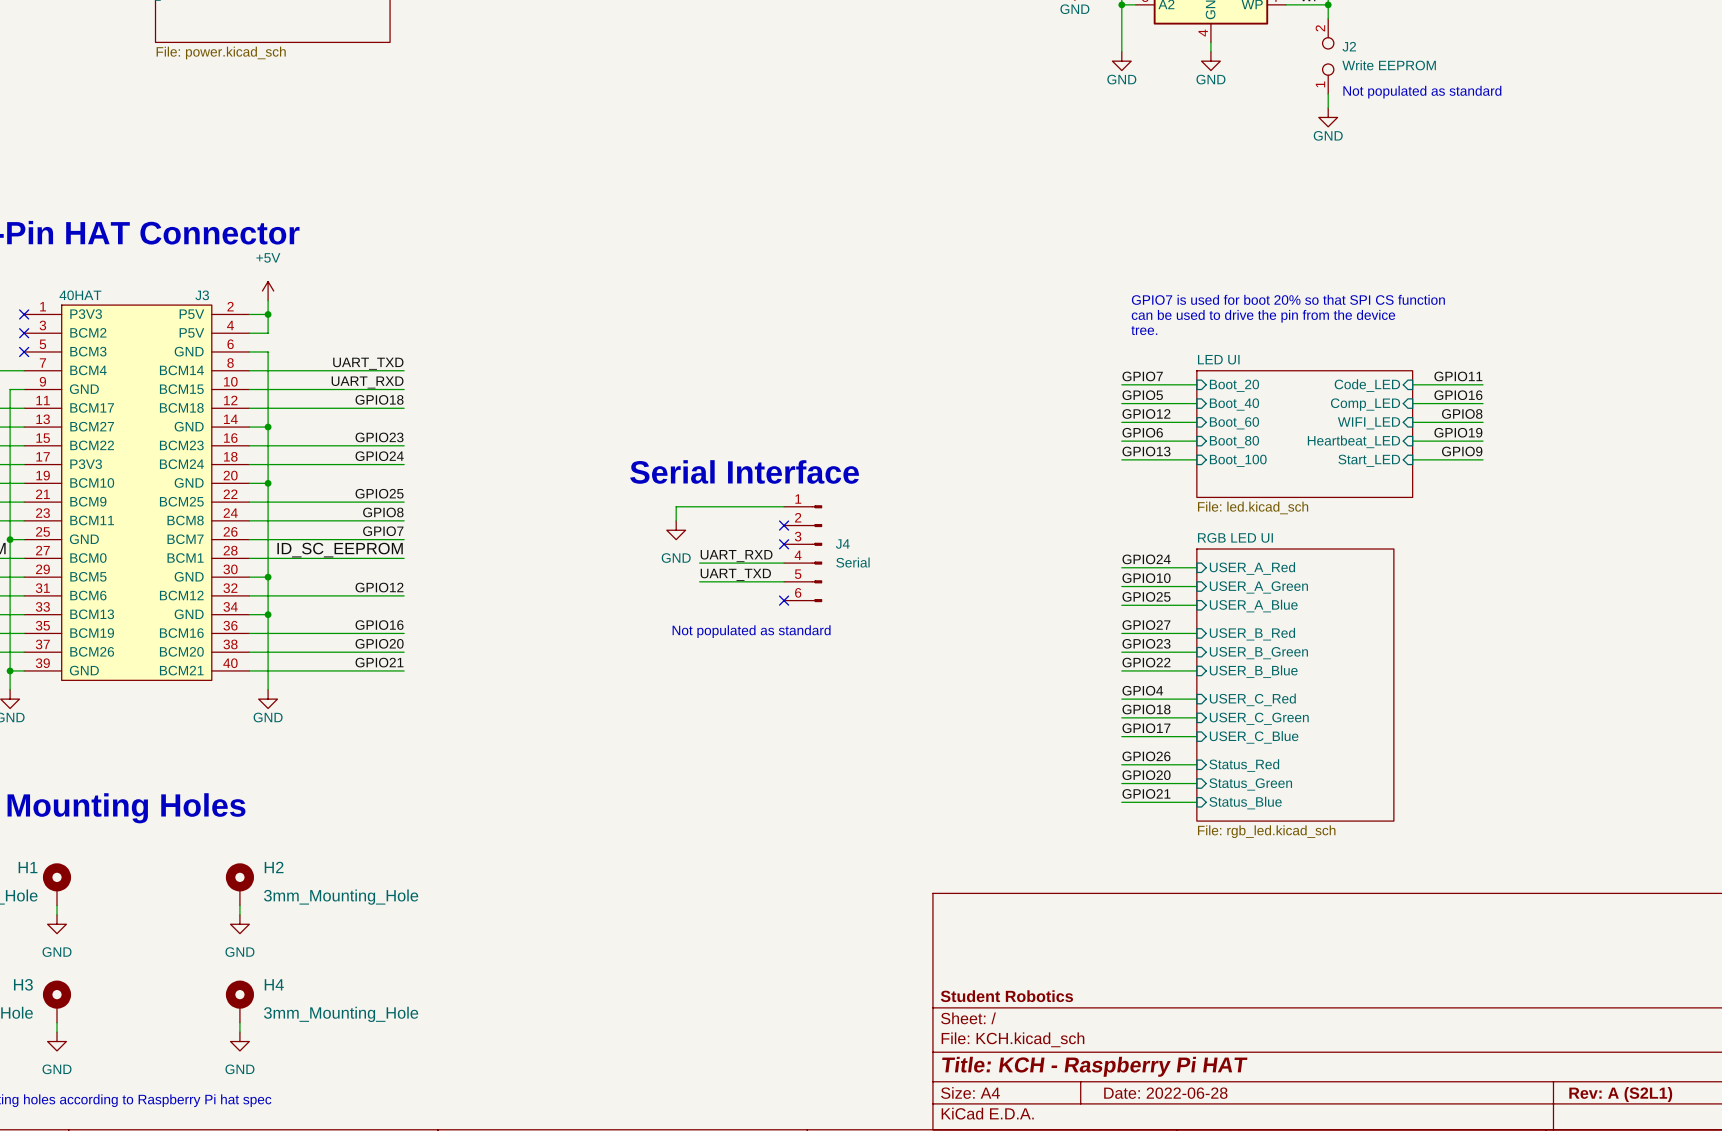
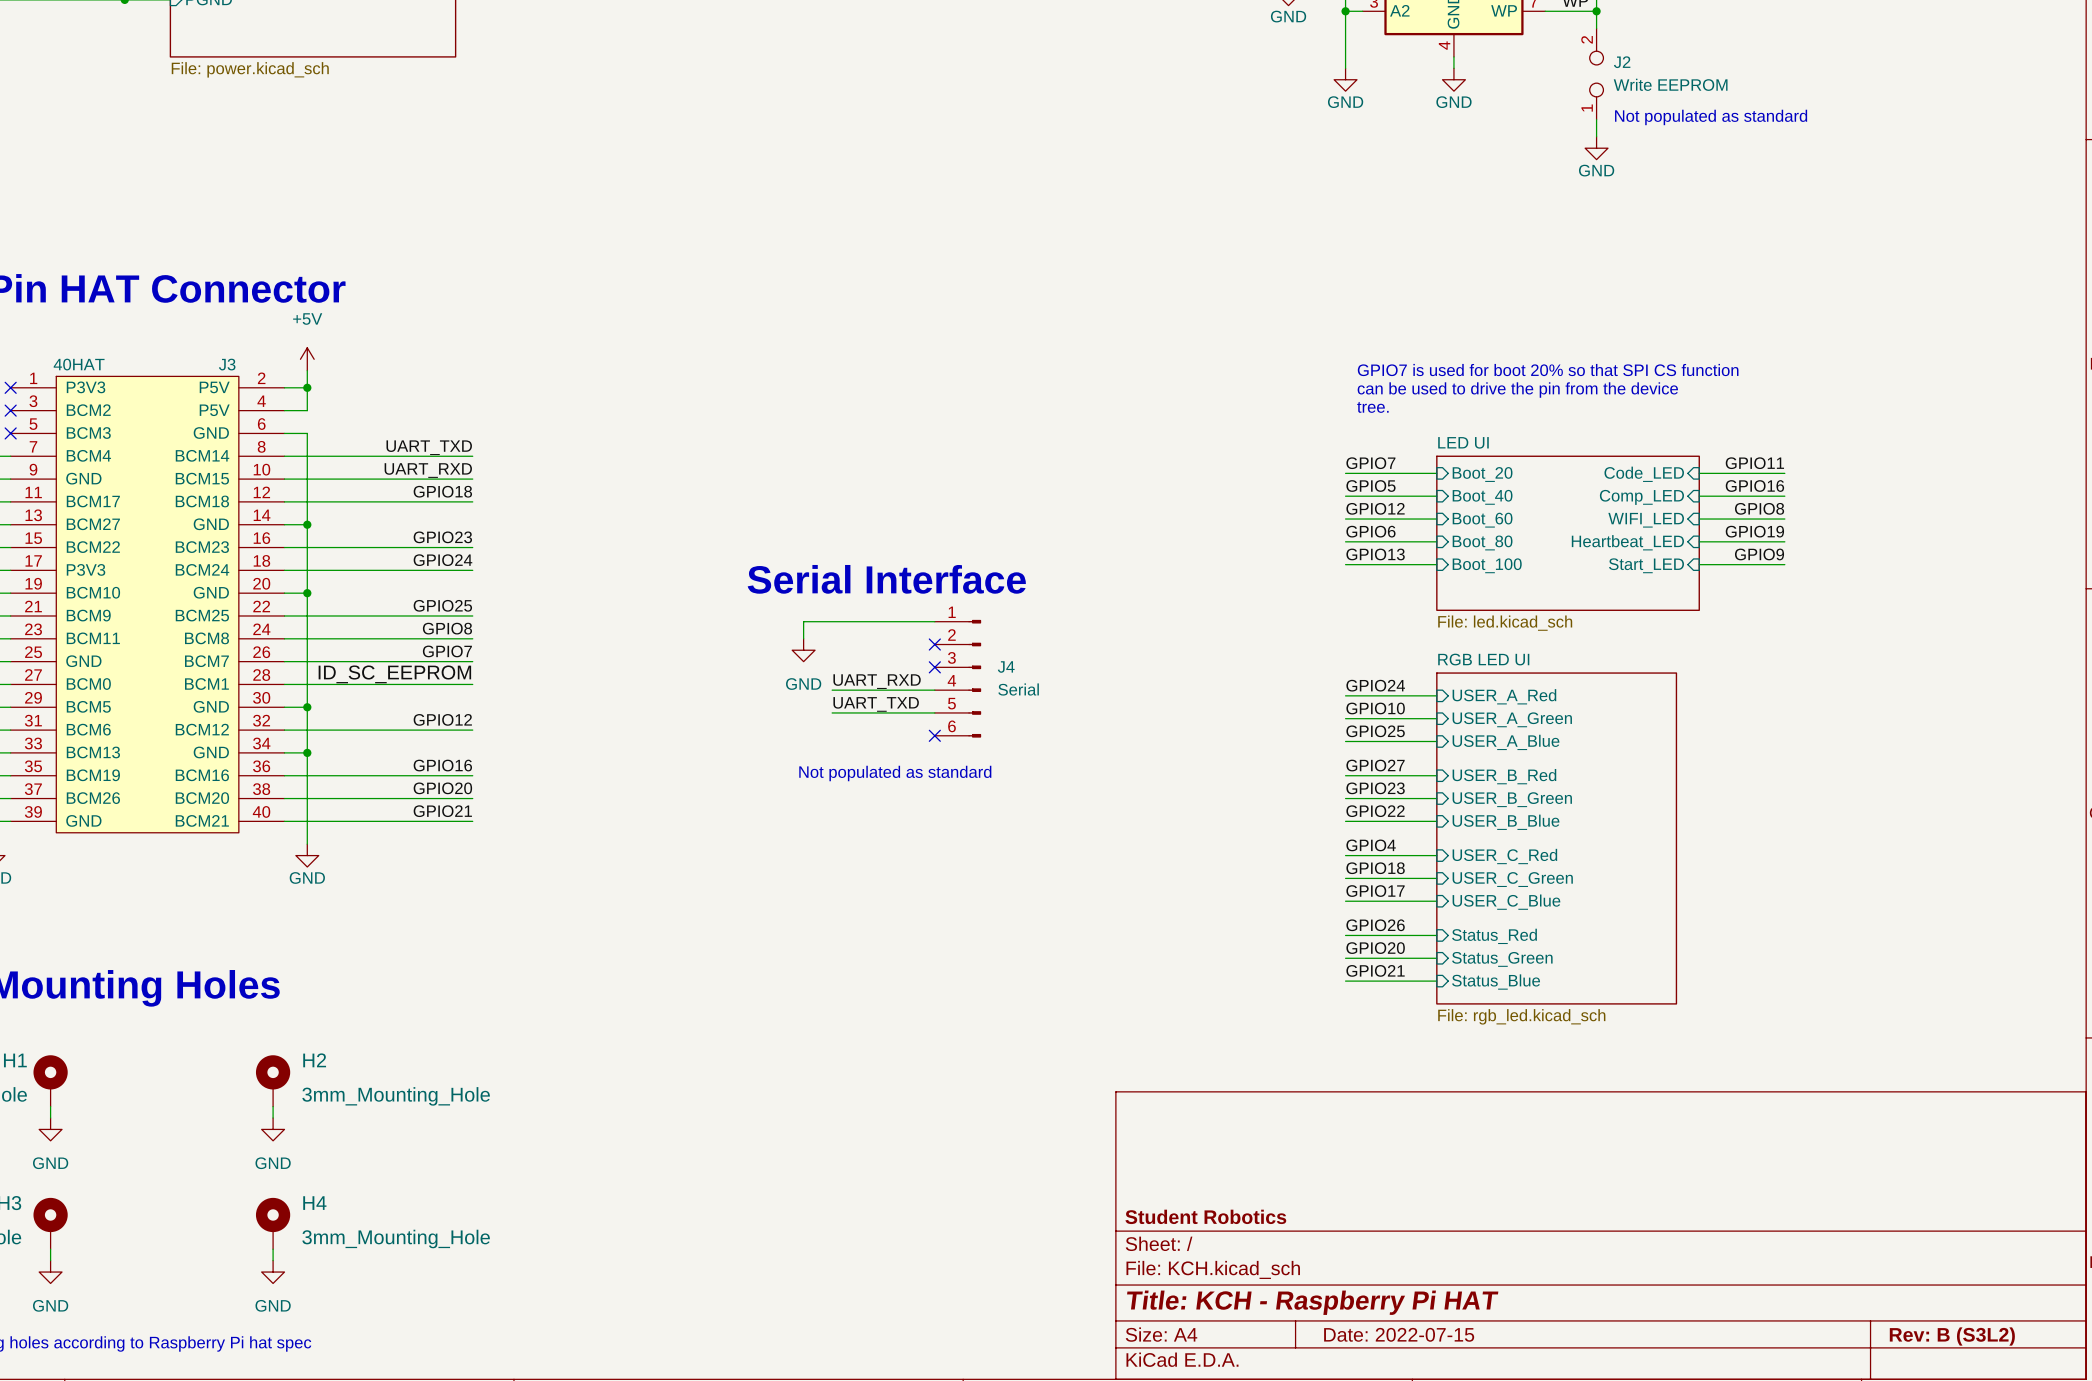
title block: Date: 2022-06-28 (1165, 1093) -> Date: 2022-07-15 (1399, 1334)
title block: Rev: A (S2L1) (1620, 1094) -> Rev: B (S3L2) (1952, 1336)

